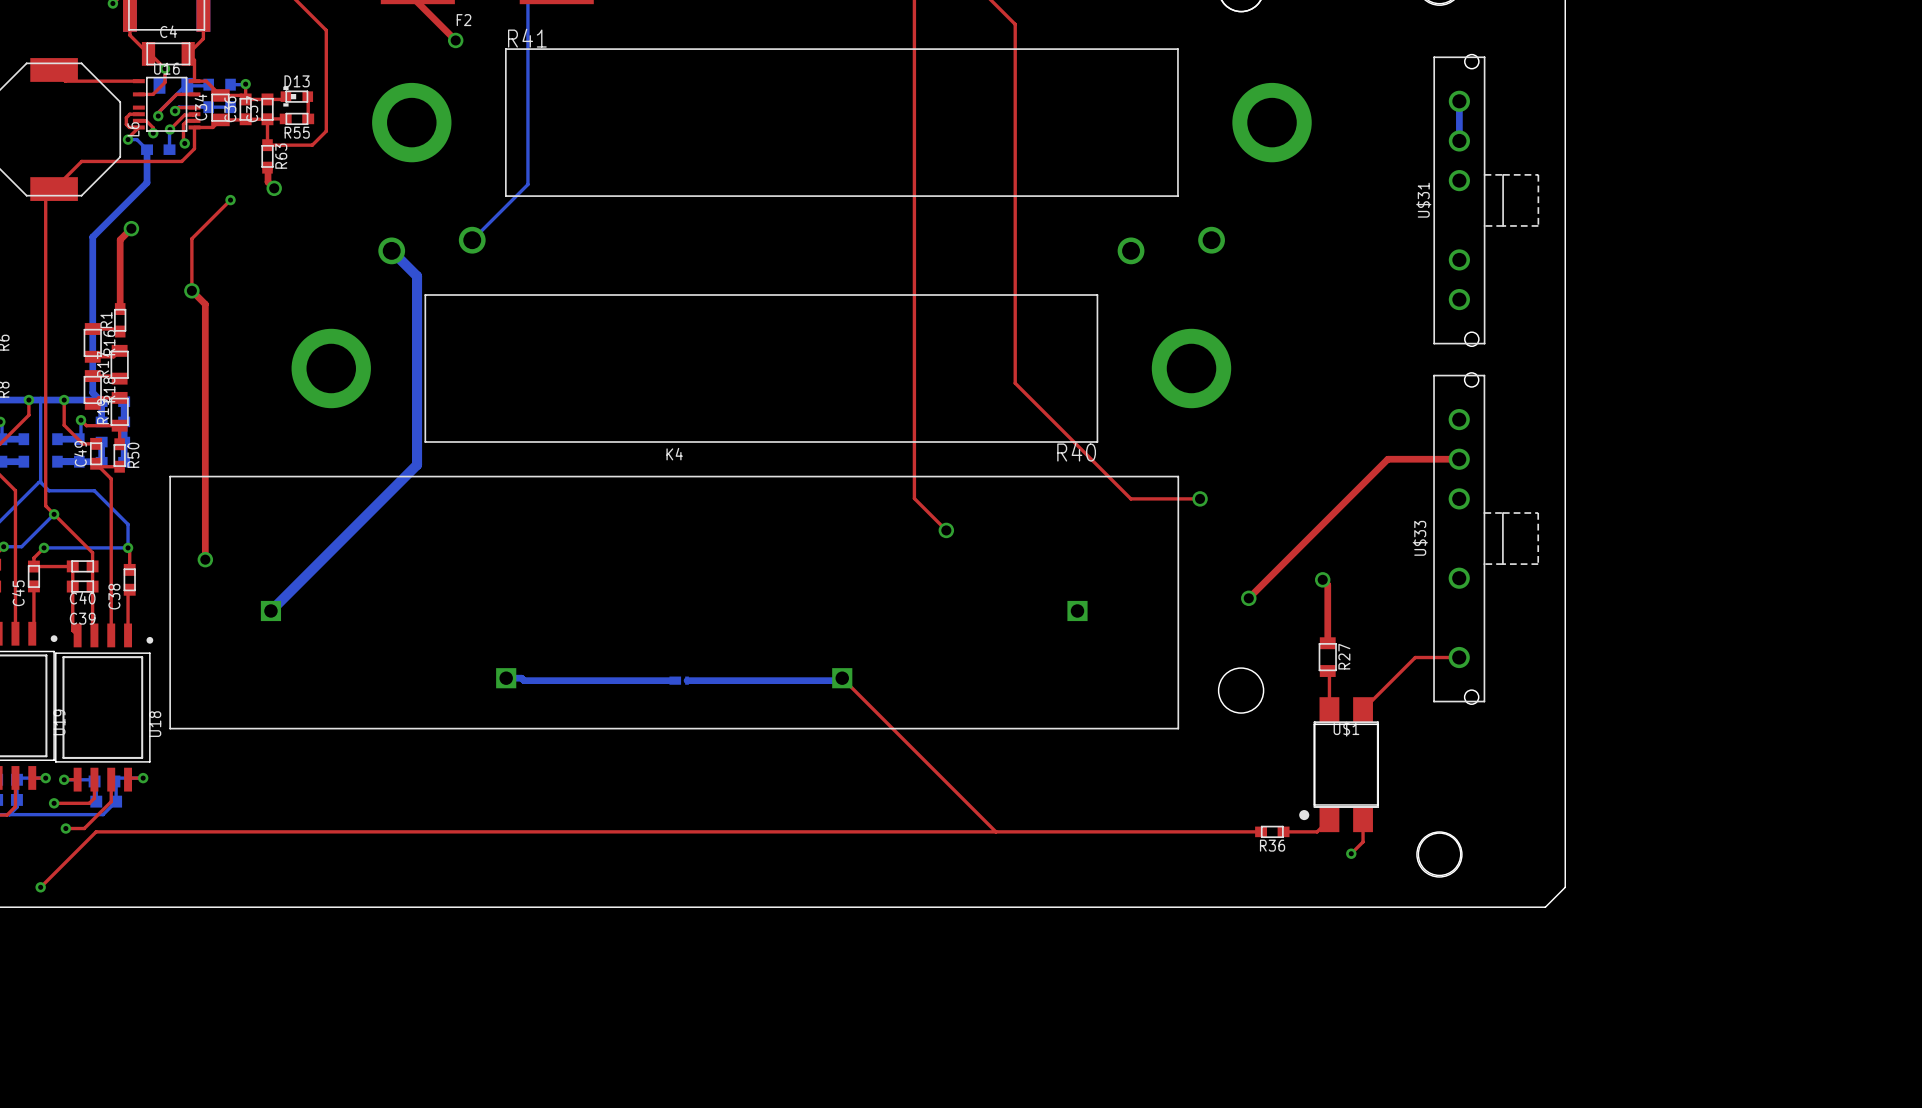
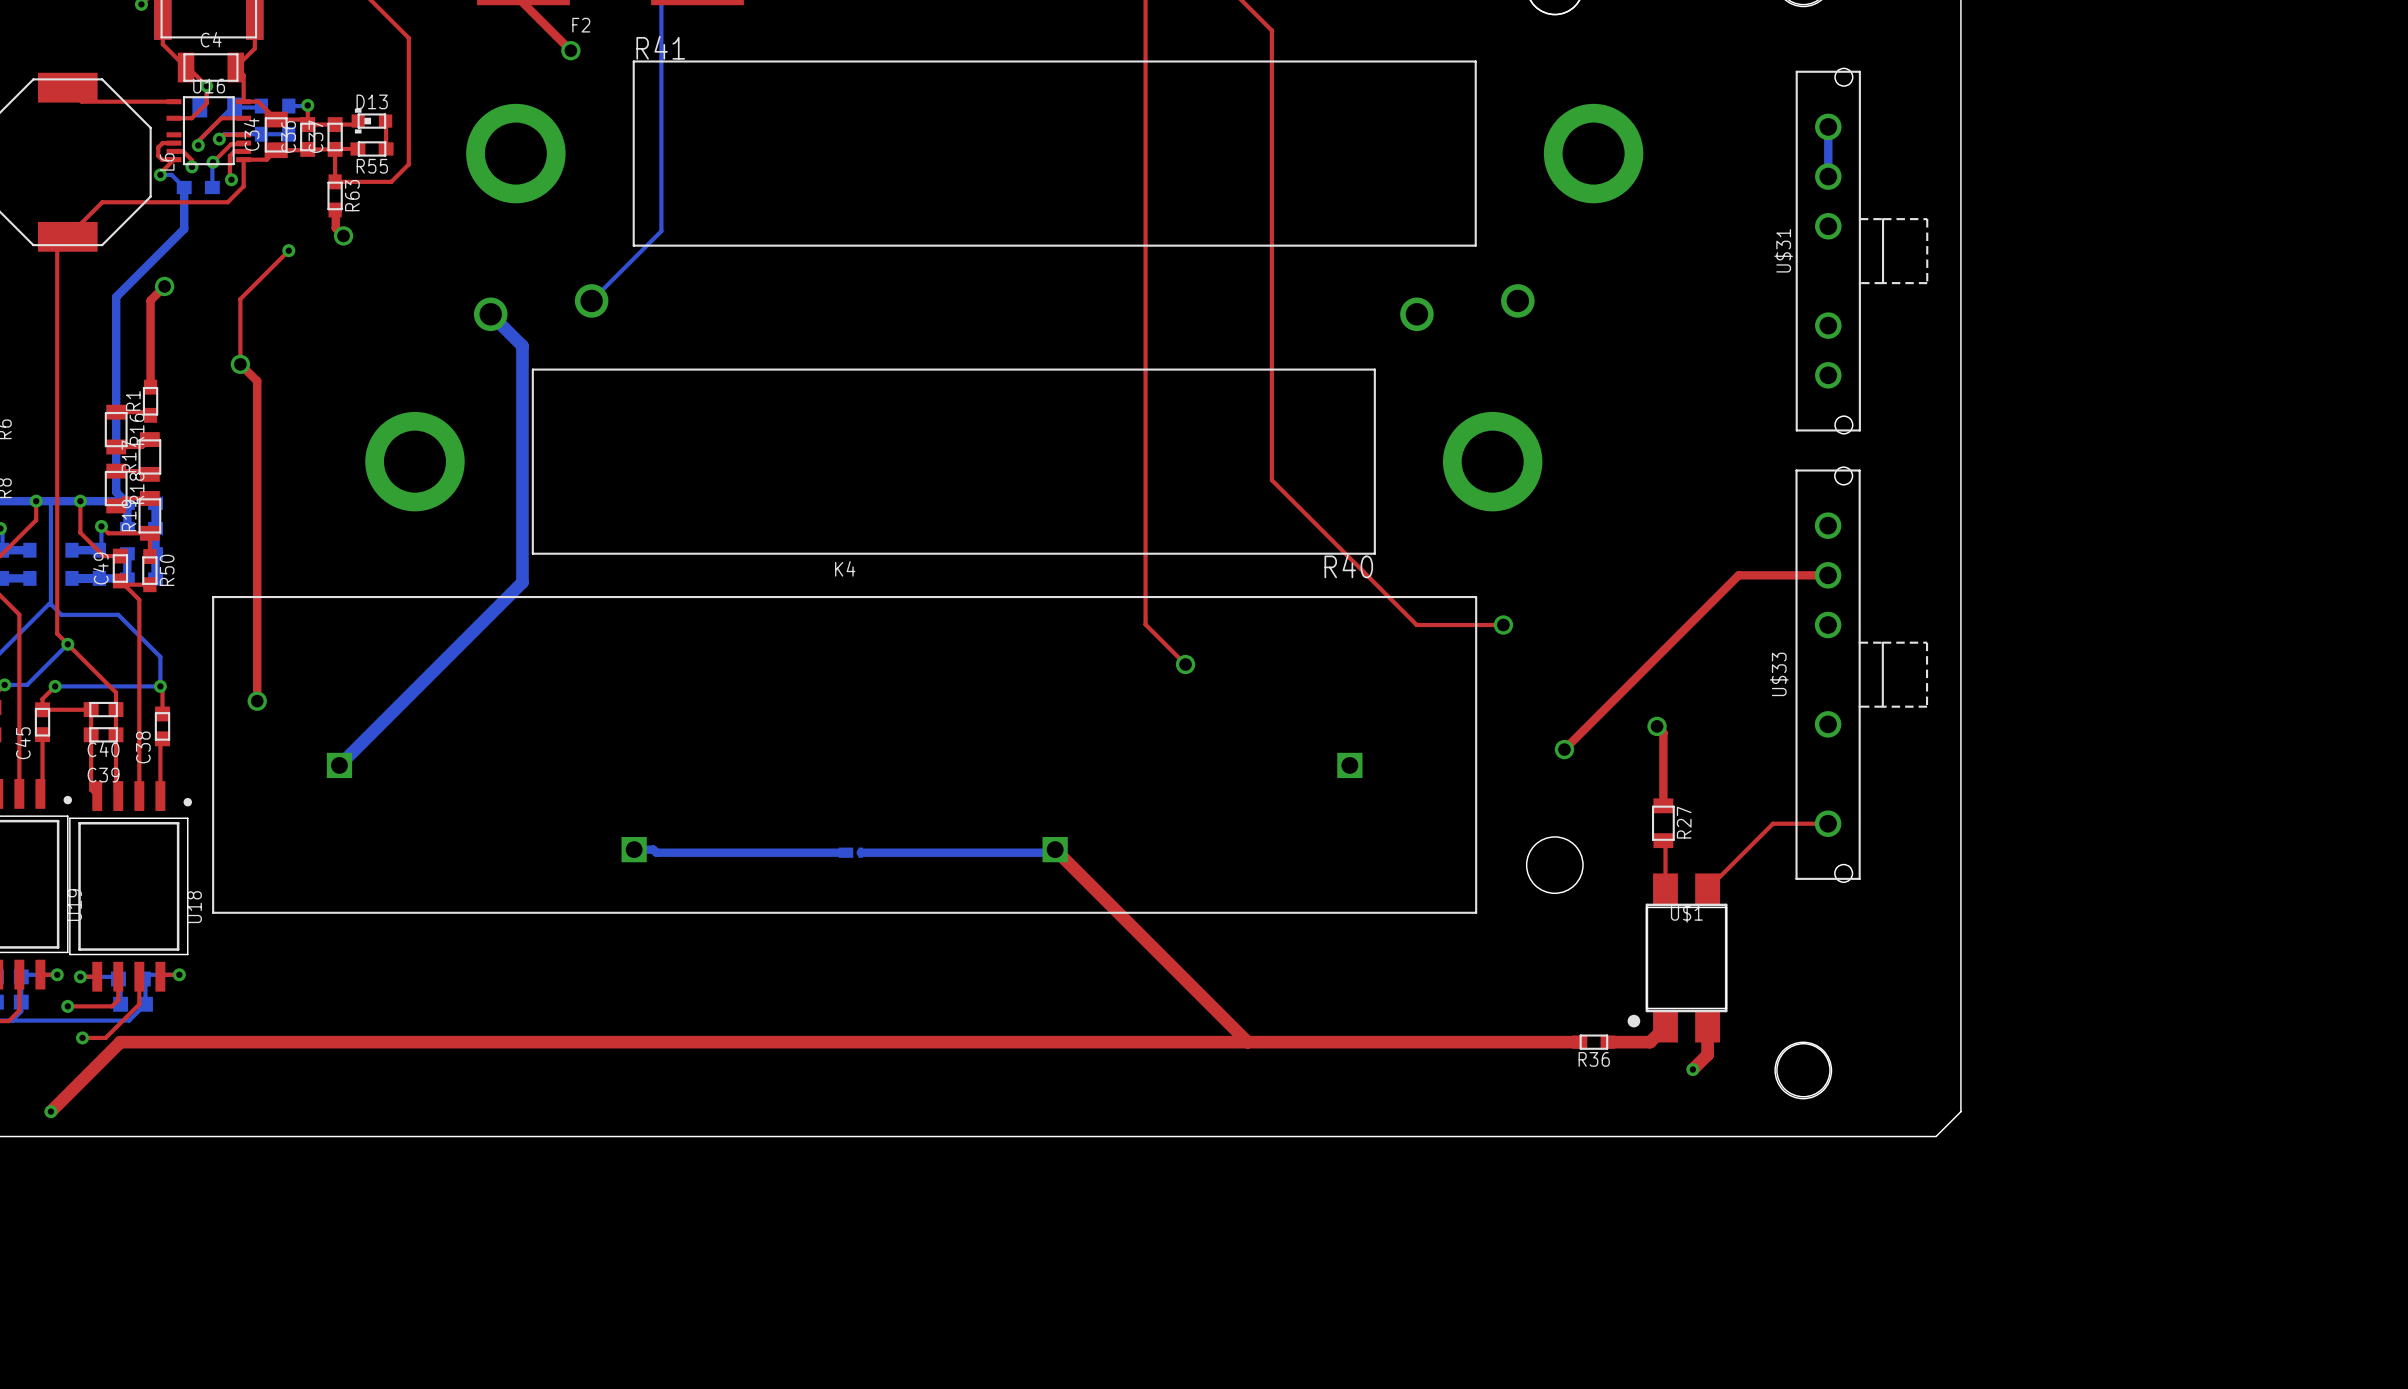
top track width: thin (842, 678) (995, 831) -> thick (1055, 849) (1247, 1042)
top track width: thin (1329, 819) (1317, 831) (1283, 831) -> thick (1665, 1026) (1650, 1042) (1608, 1042)
top track width: thin (1363, 819) (1363, 841) (1351, 853) -> thick (1707, 1026) (1707, 1054) (1692, 1069)
top track width: thin (1261, 831) (96, 831) (40, 887) -> thick (1579, 1042) (120, 1042) (50, 1111)

